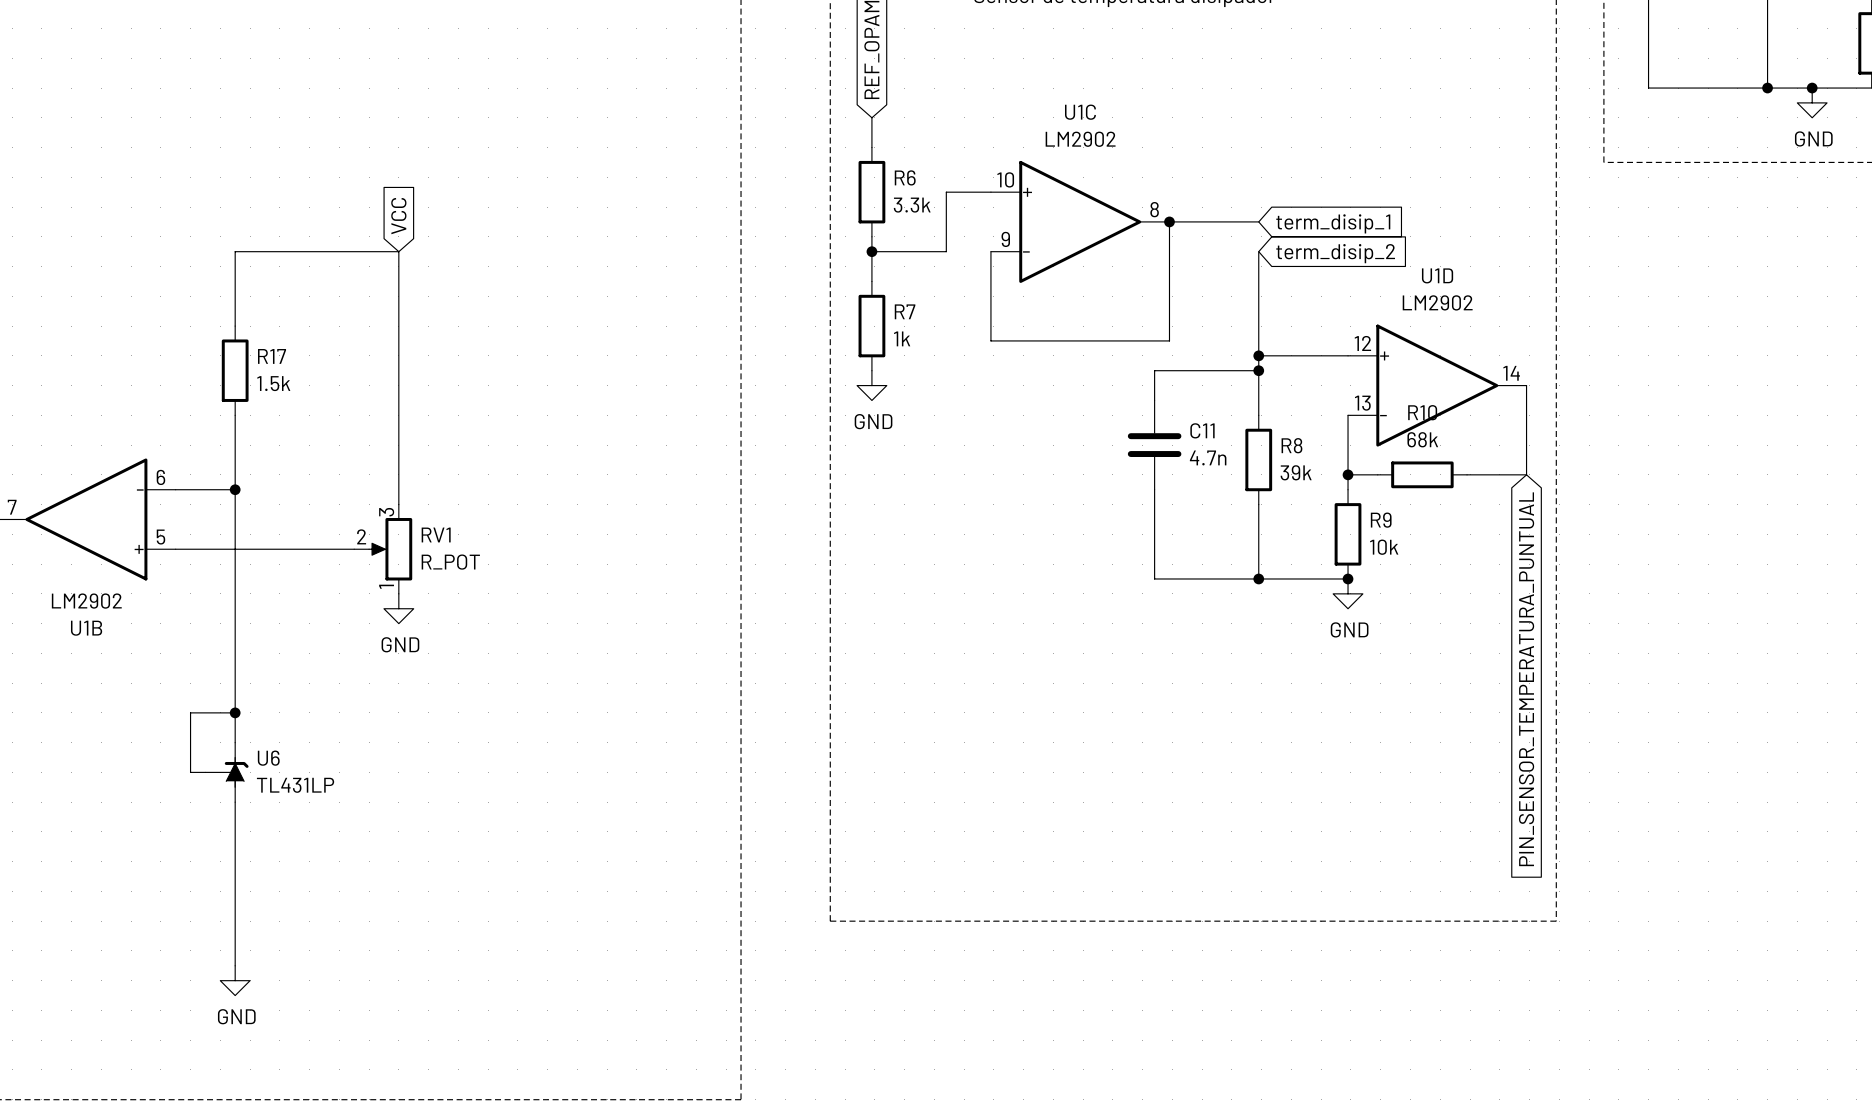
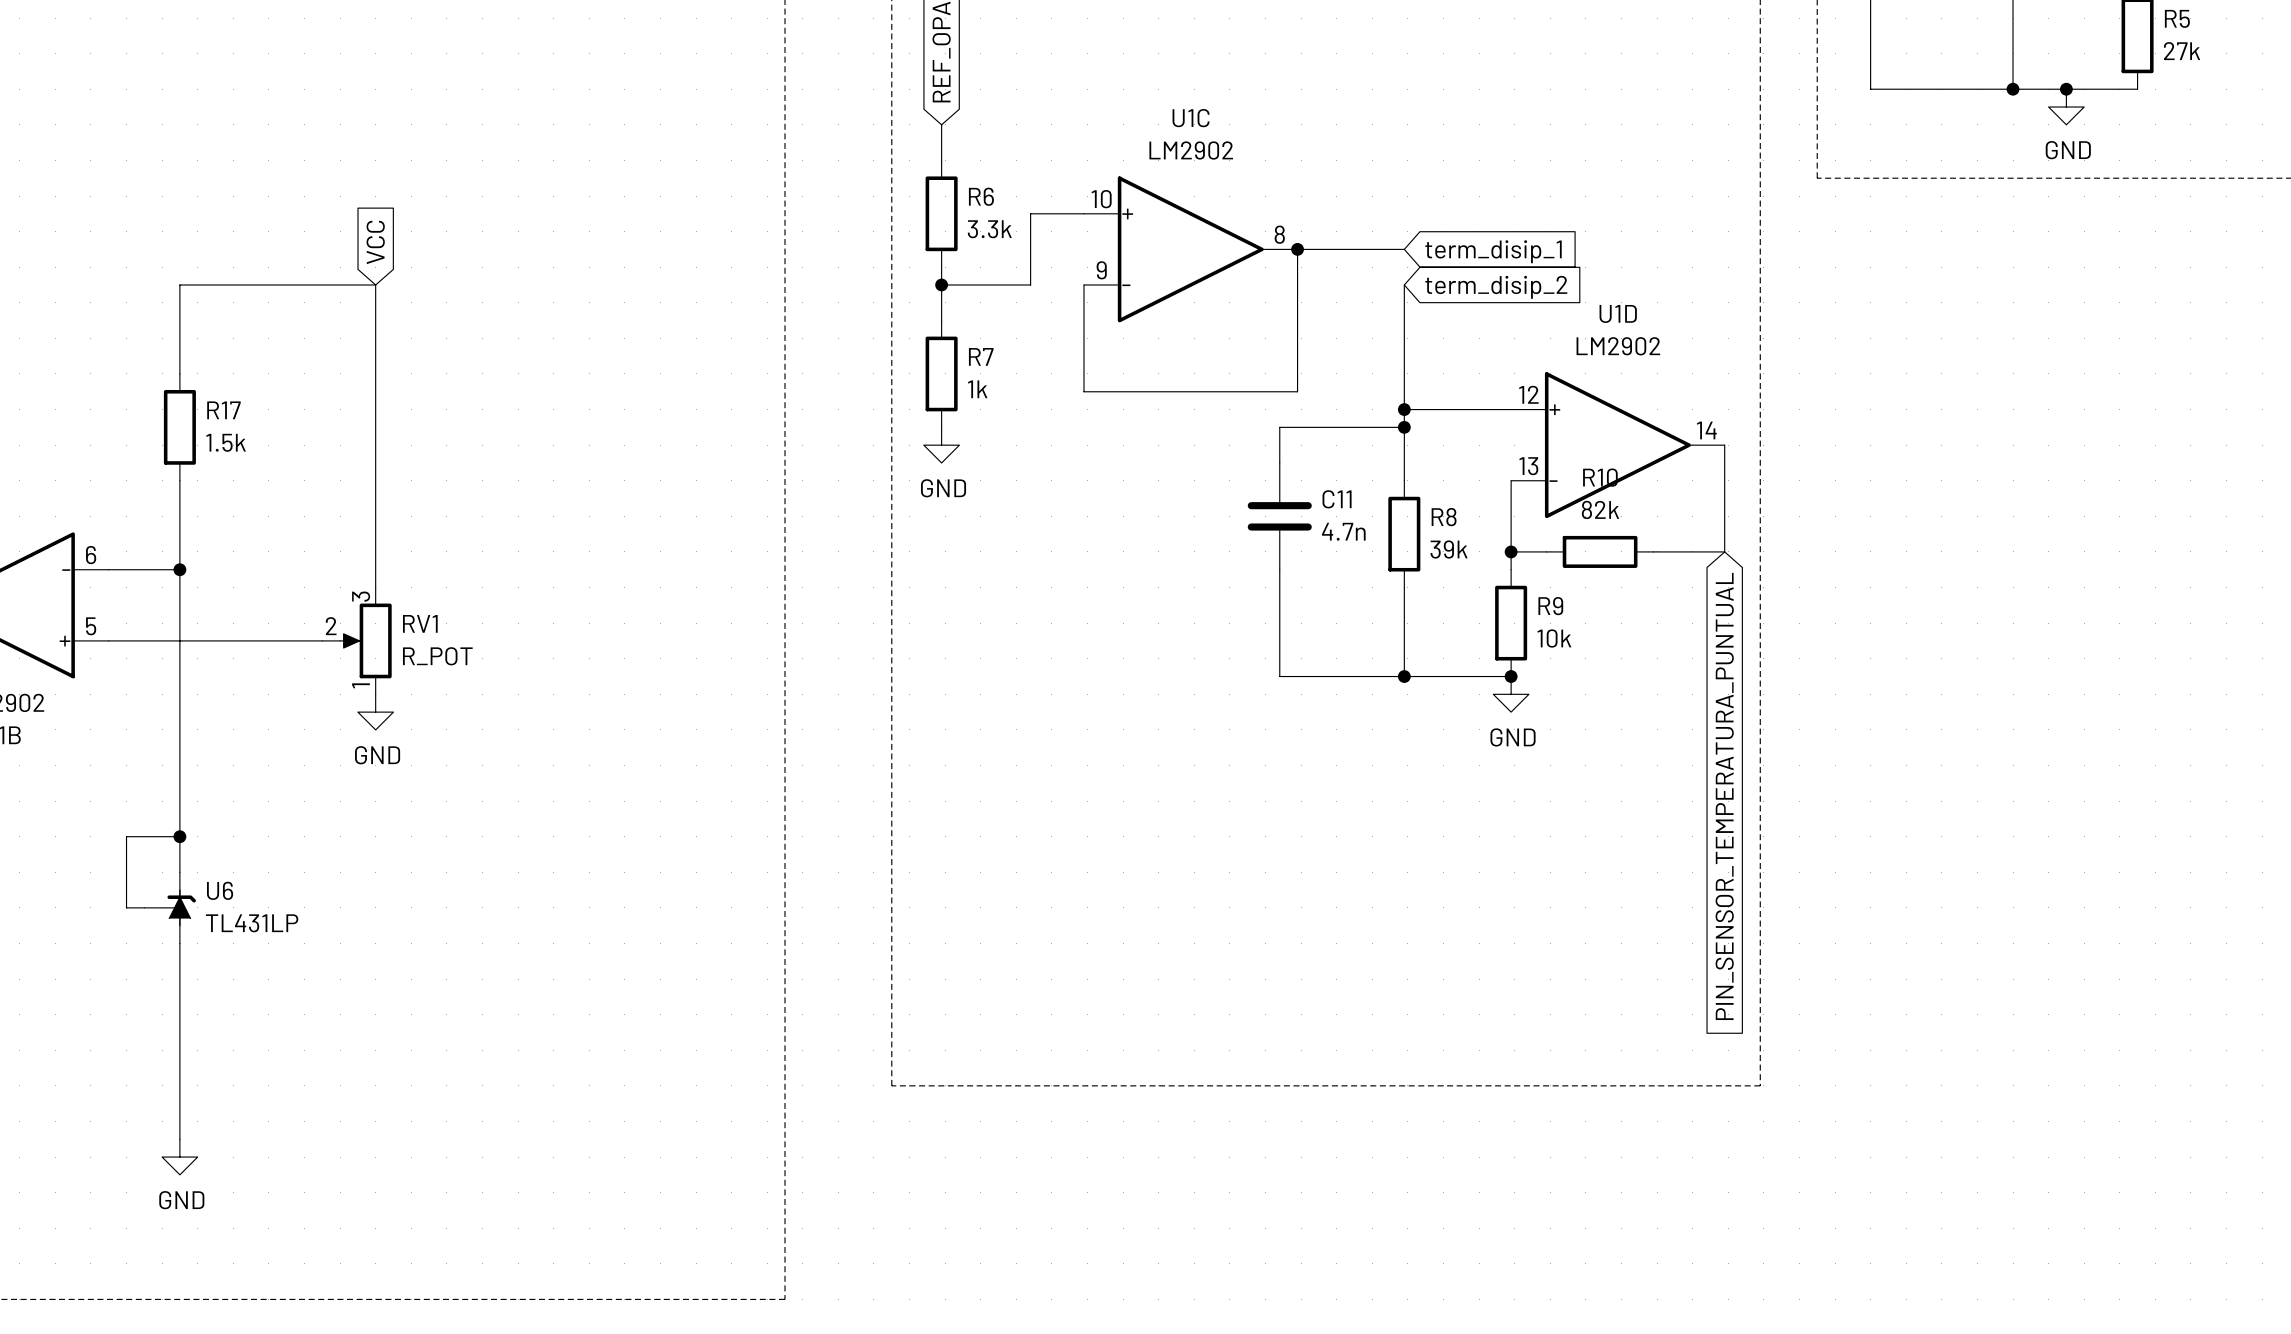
R10 value: 68k (1422, 439) -> 82k (1600, 509)

